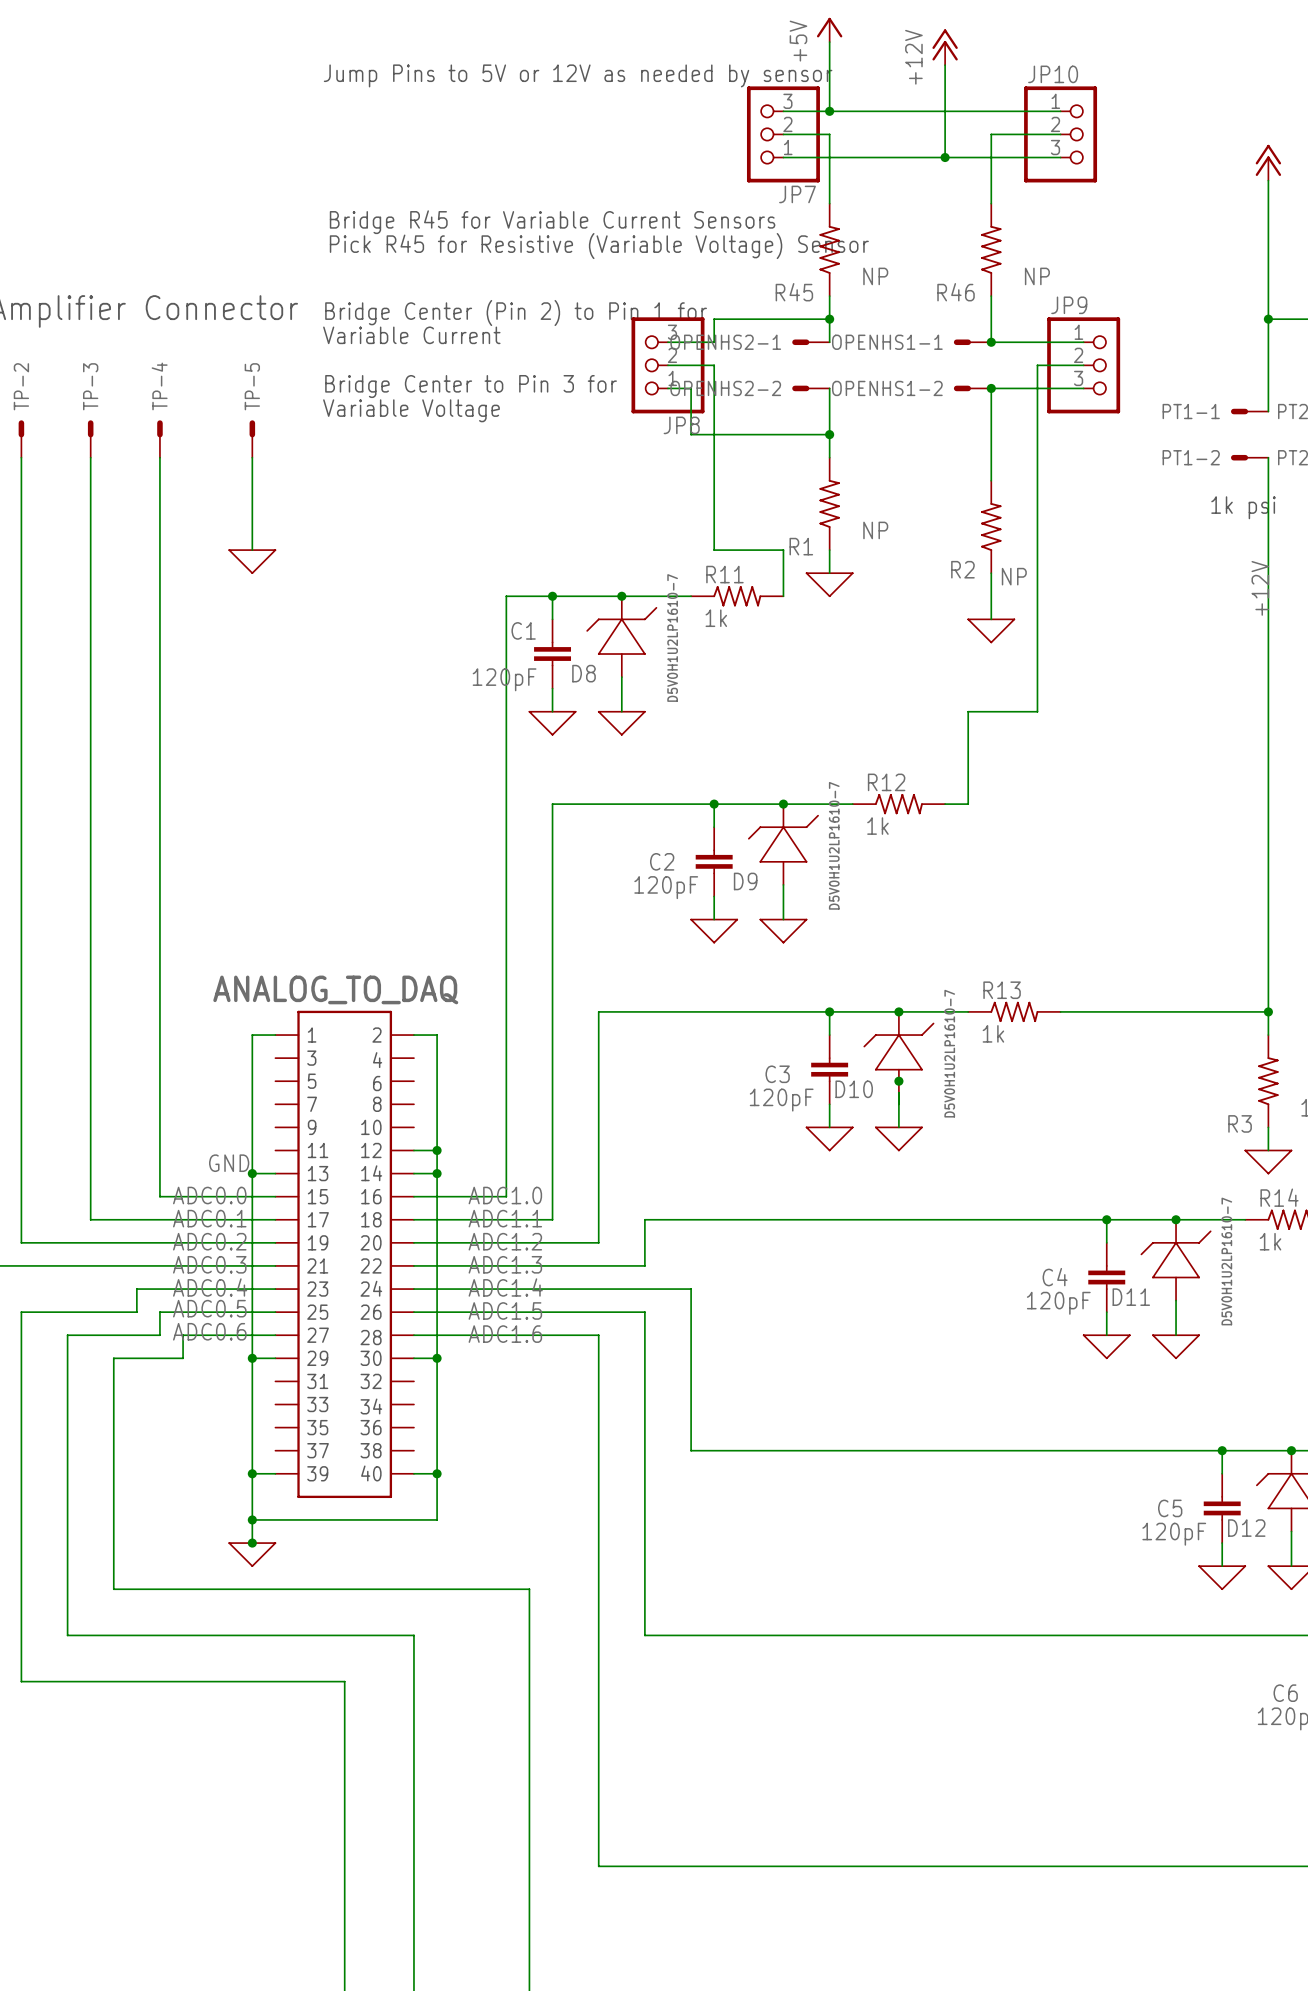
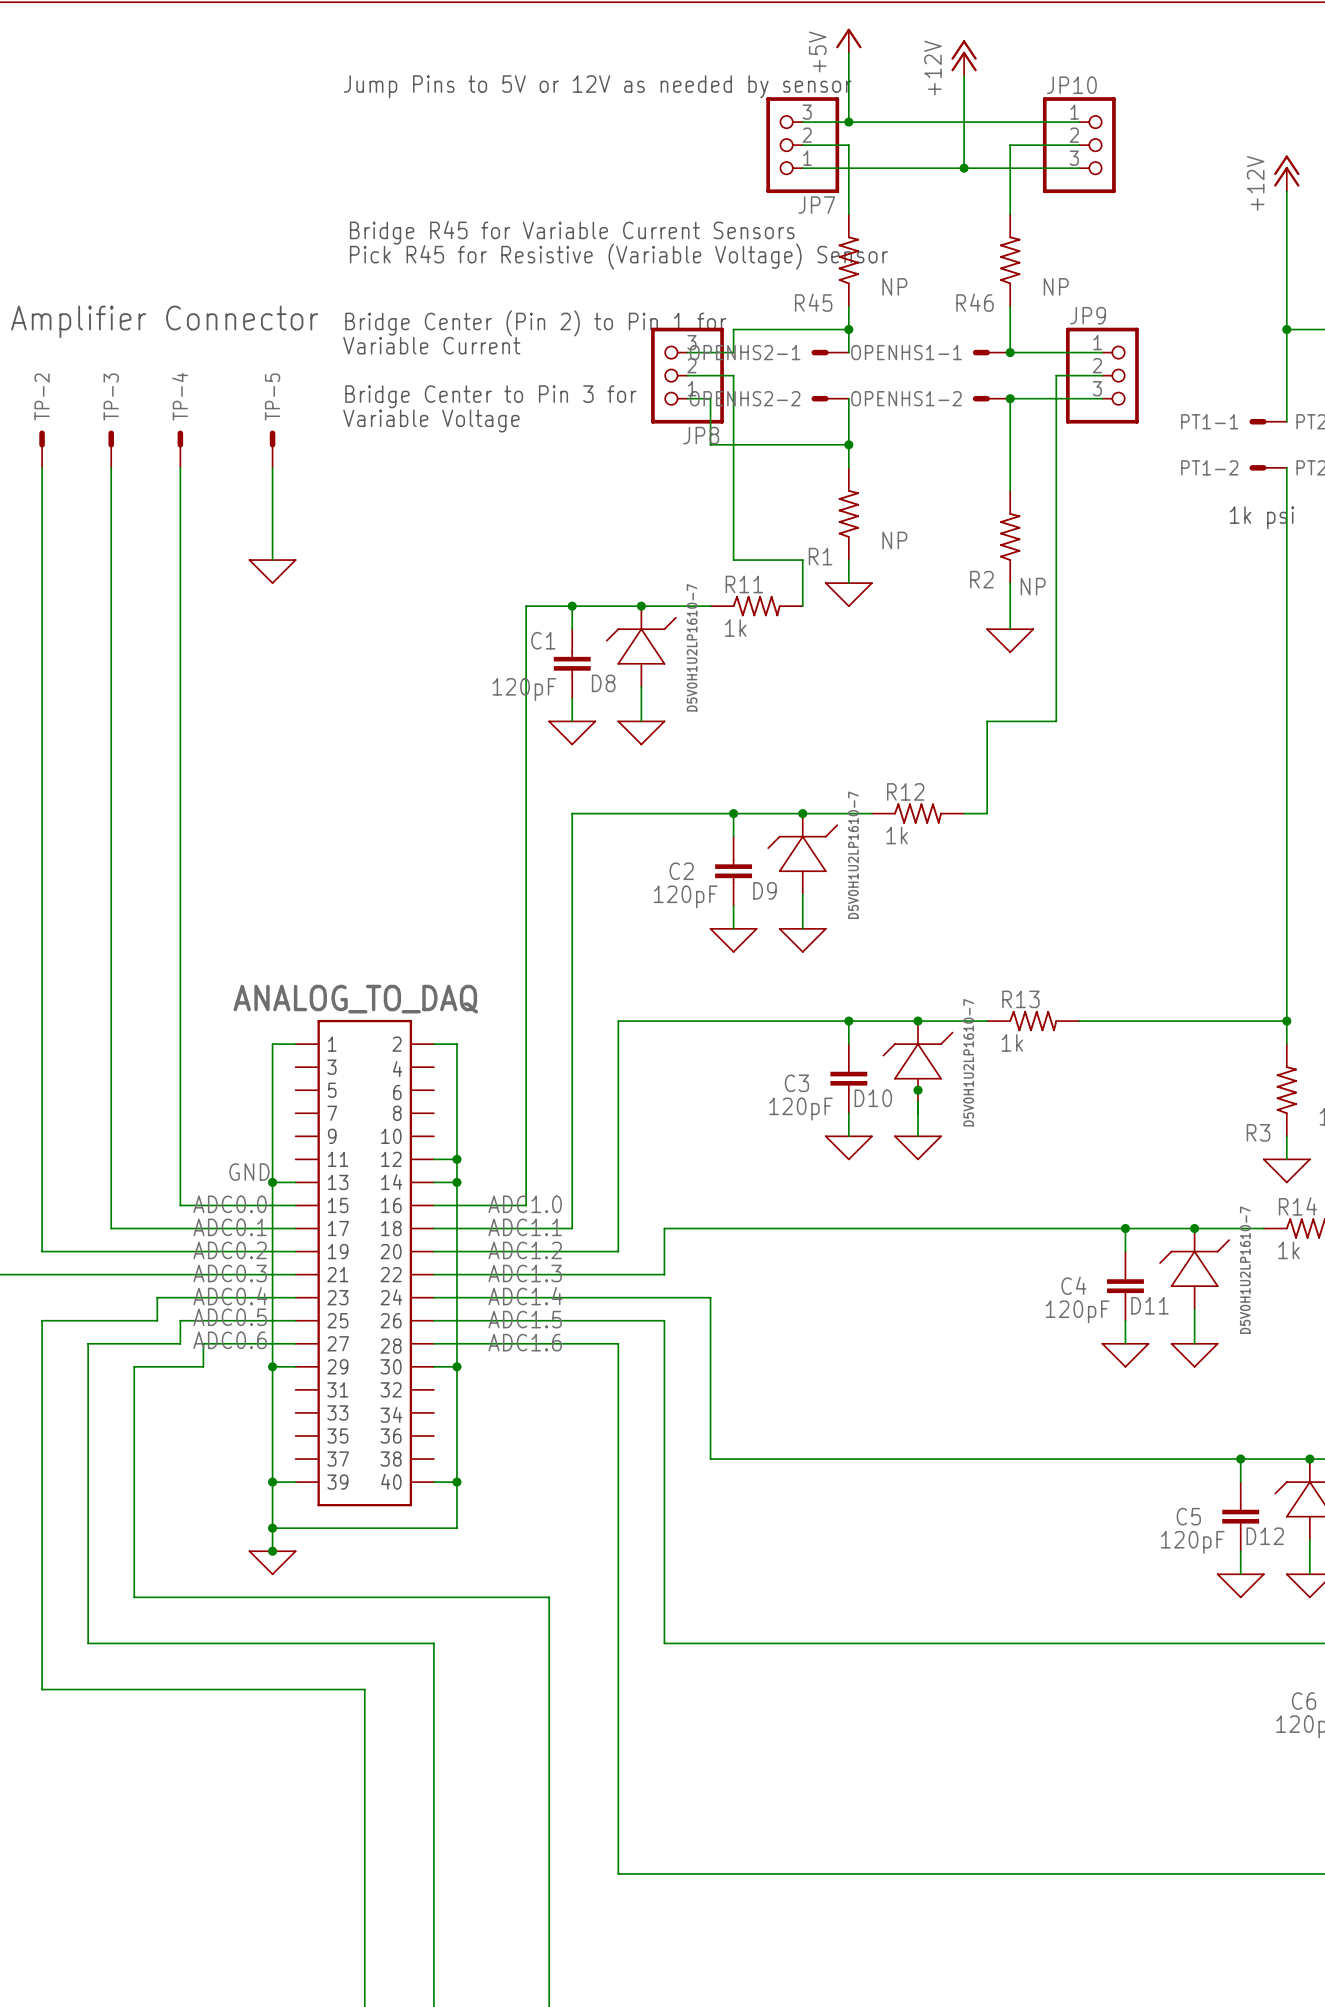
power symbol text position: +12V (1260, 588) -> +12V (1255, 183)

